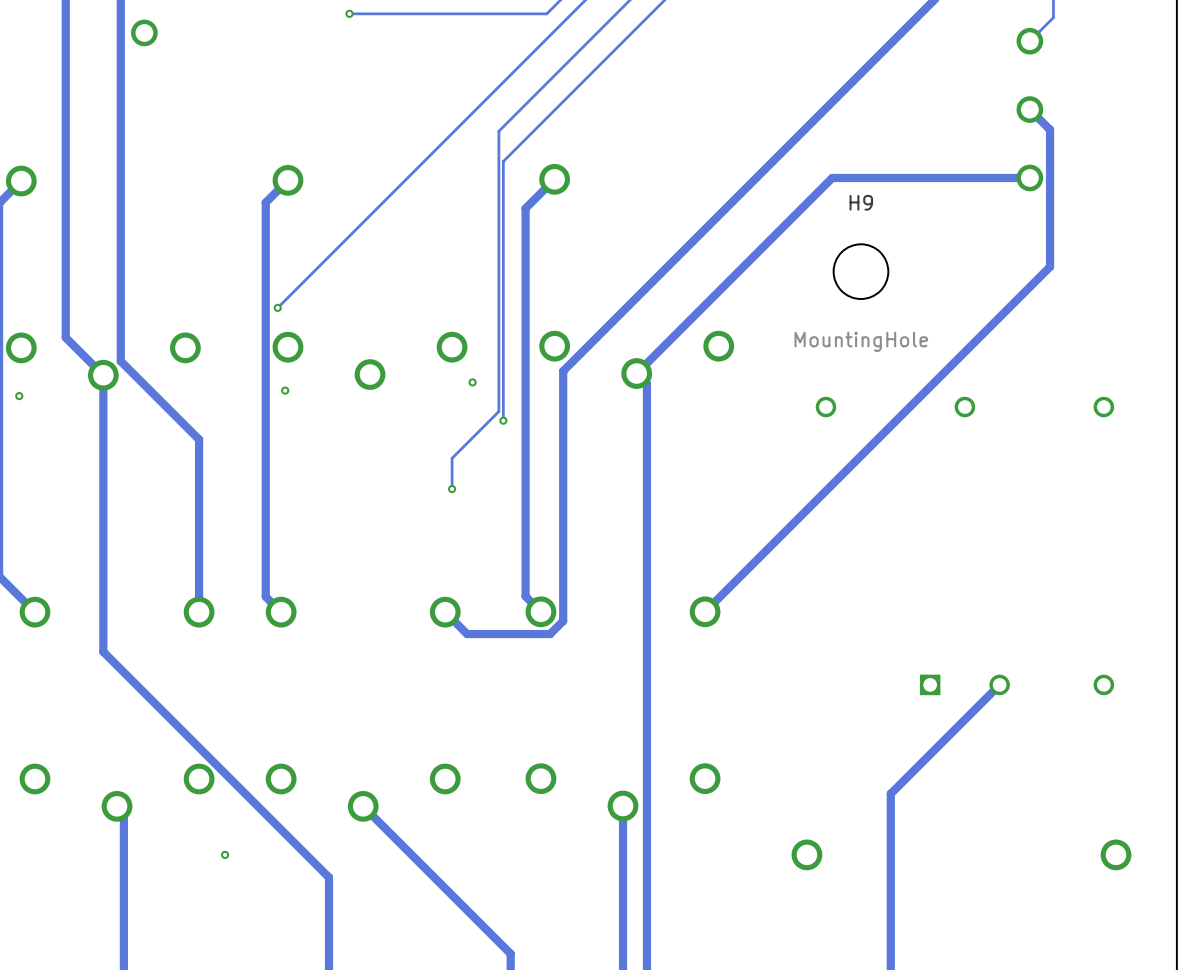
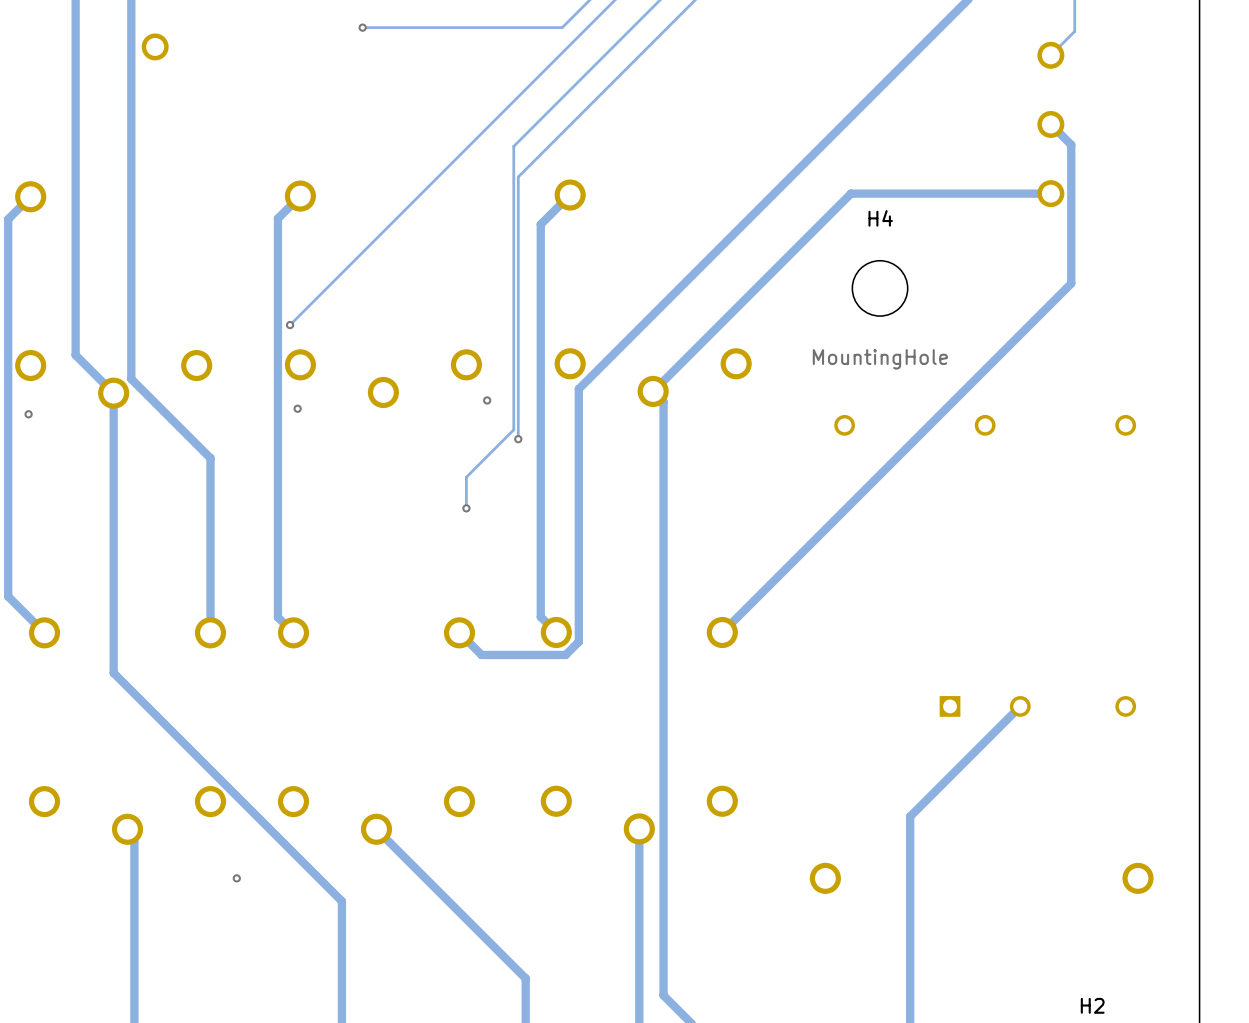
H9 name: H9 (861, 202) -> H4 (880, 218)

